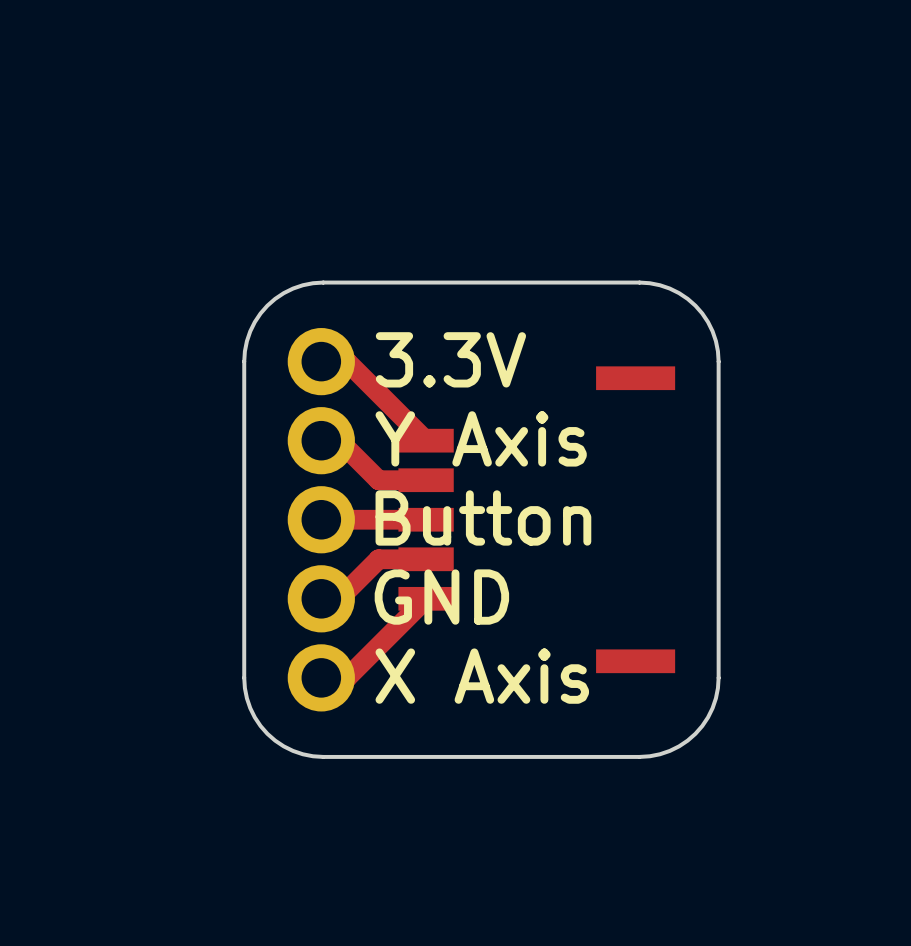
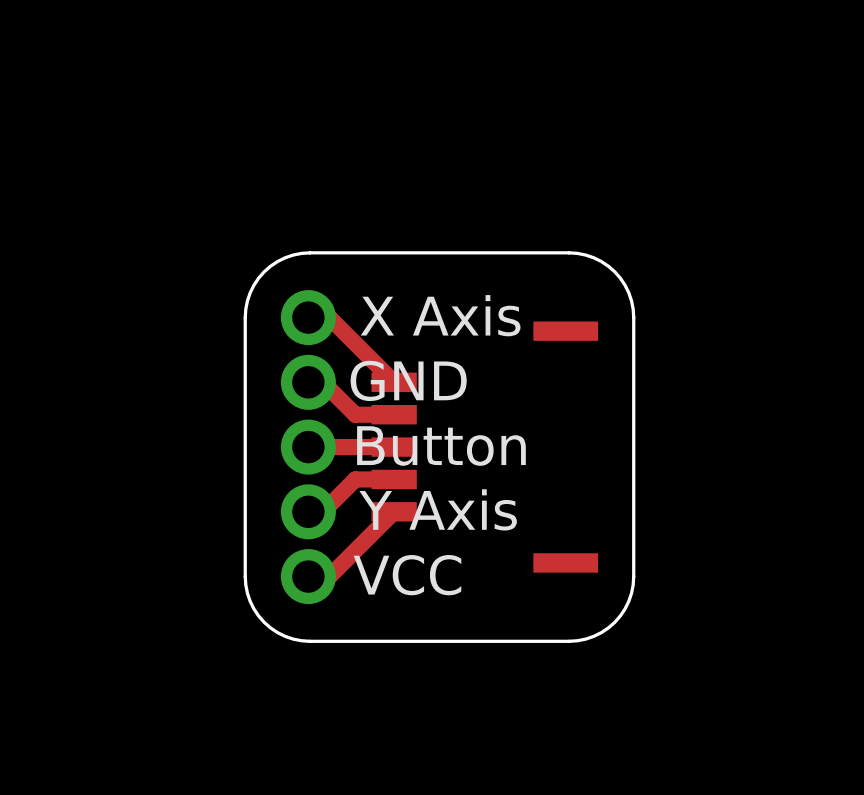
text: 3.3V (450, 359) -> none
text position: Y Axis (481, 438) -> Y Axis (438, 509)
text position: GND (441, 597) -> GND (408, 380)
text: none -> VCC (407, 575)
text position: X Axis (482, 676) -> X Axis (440, 315)

